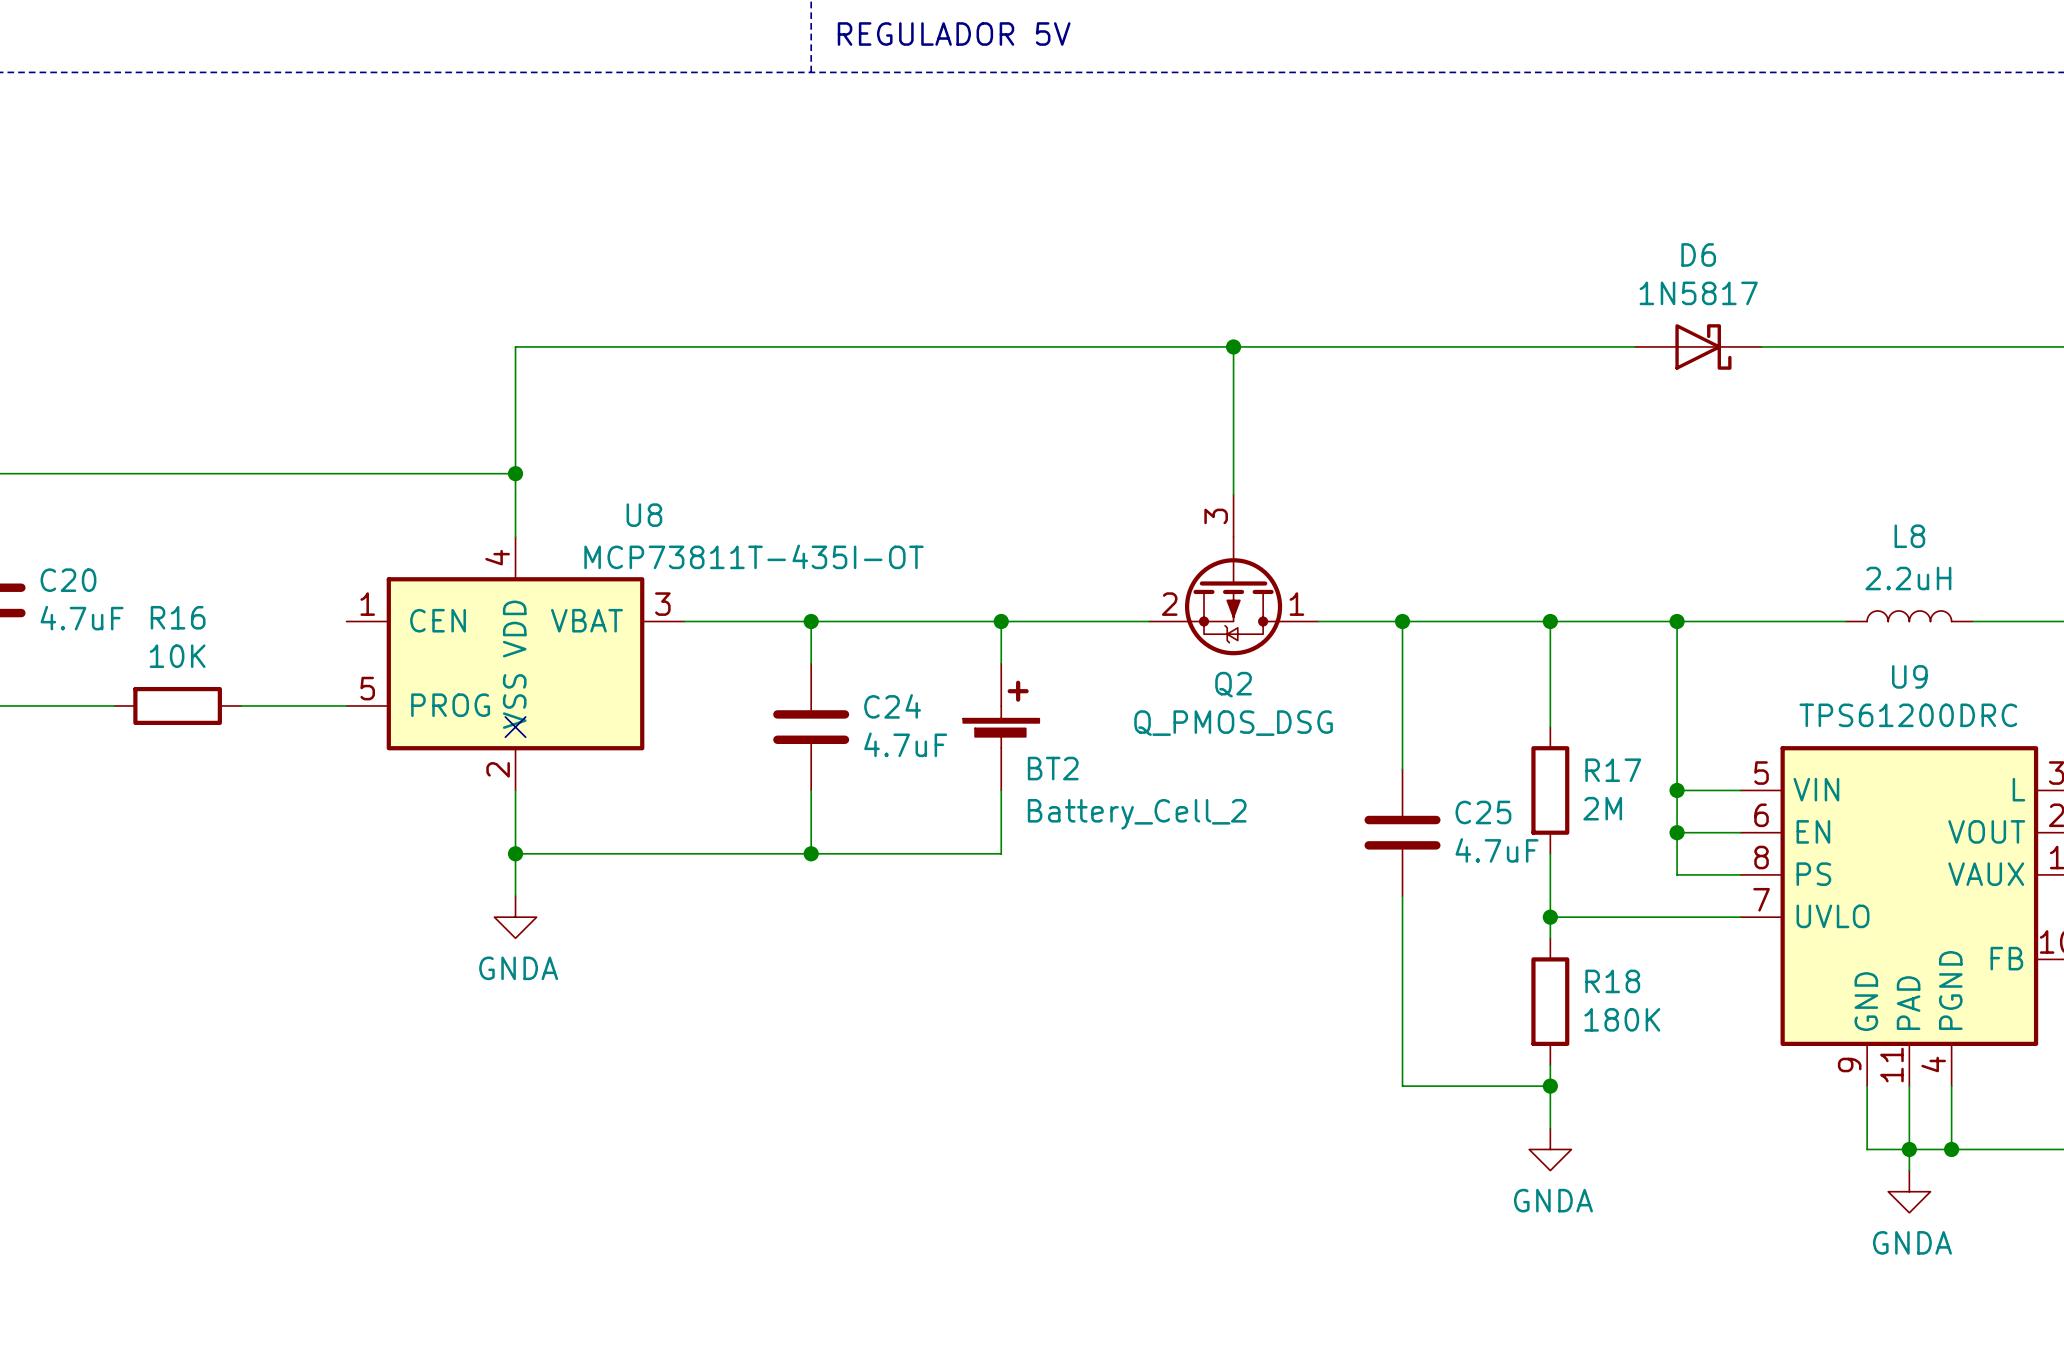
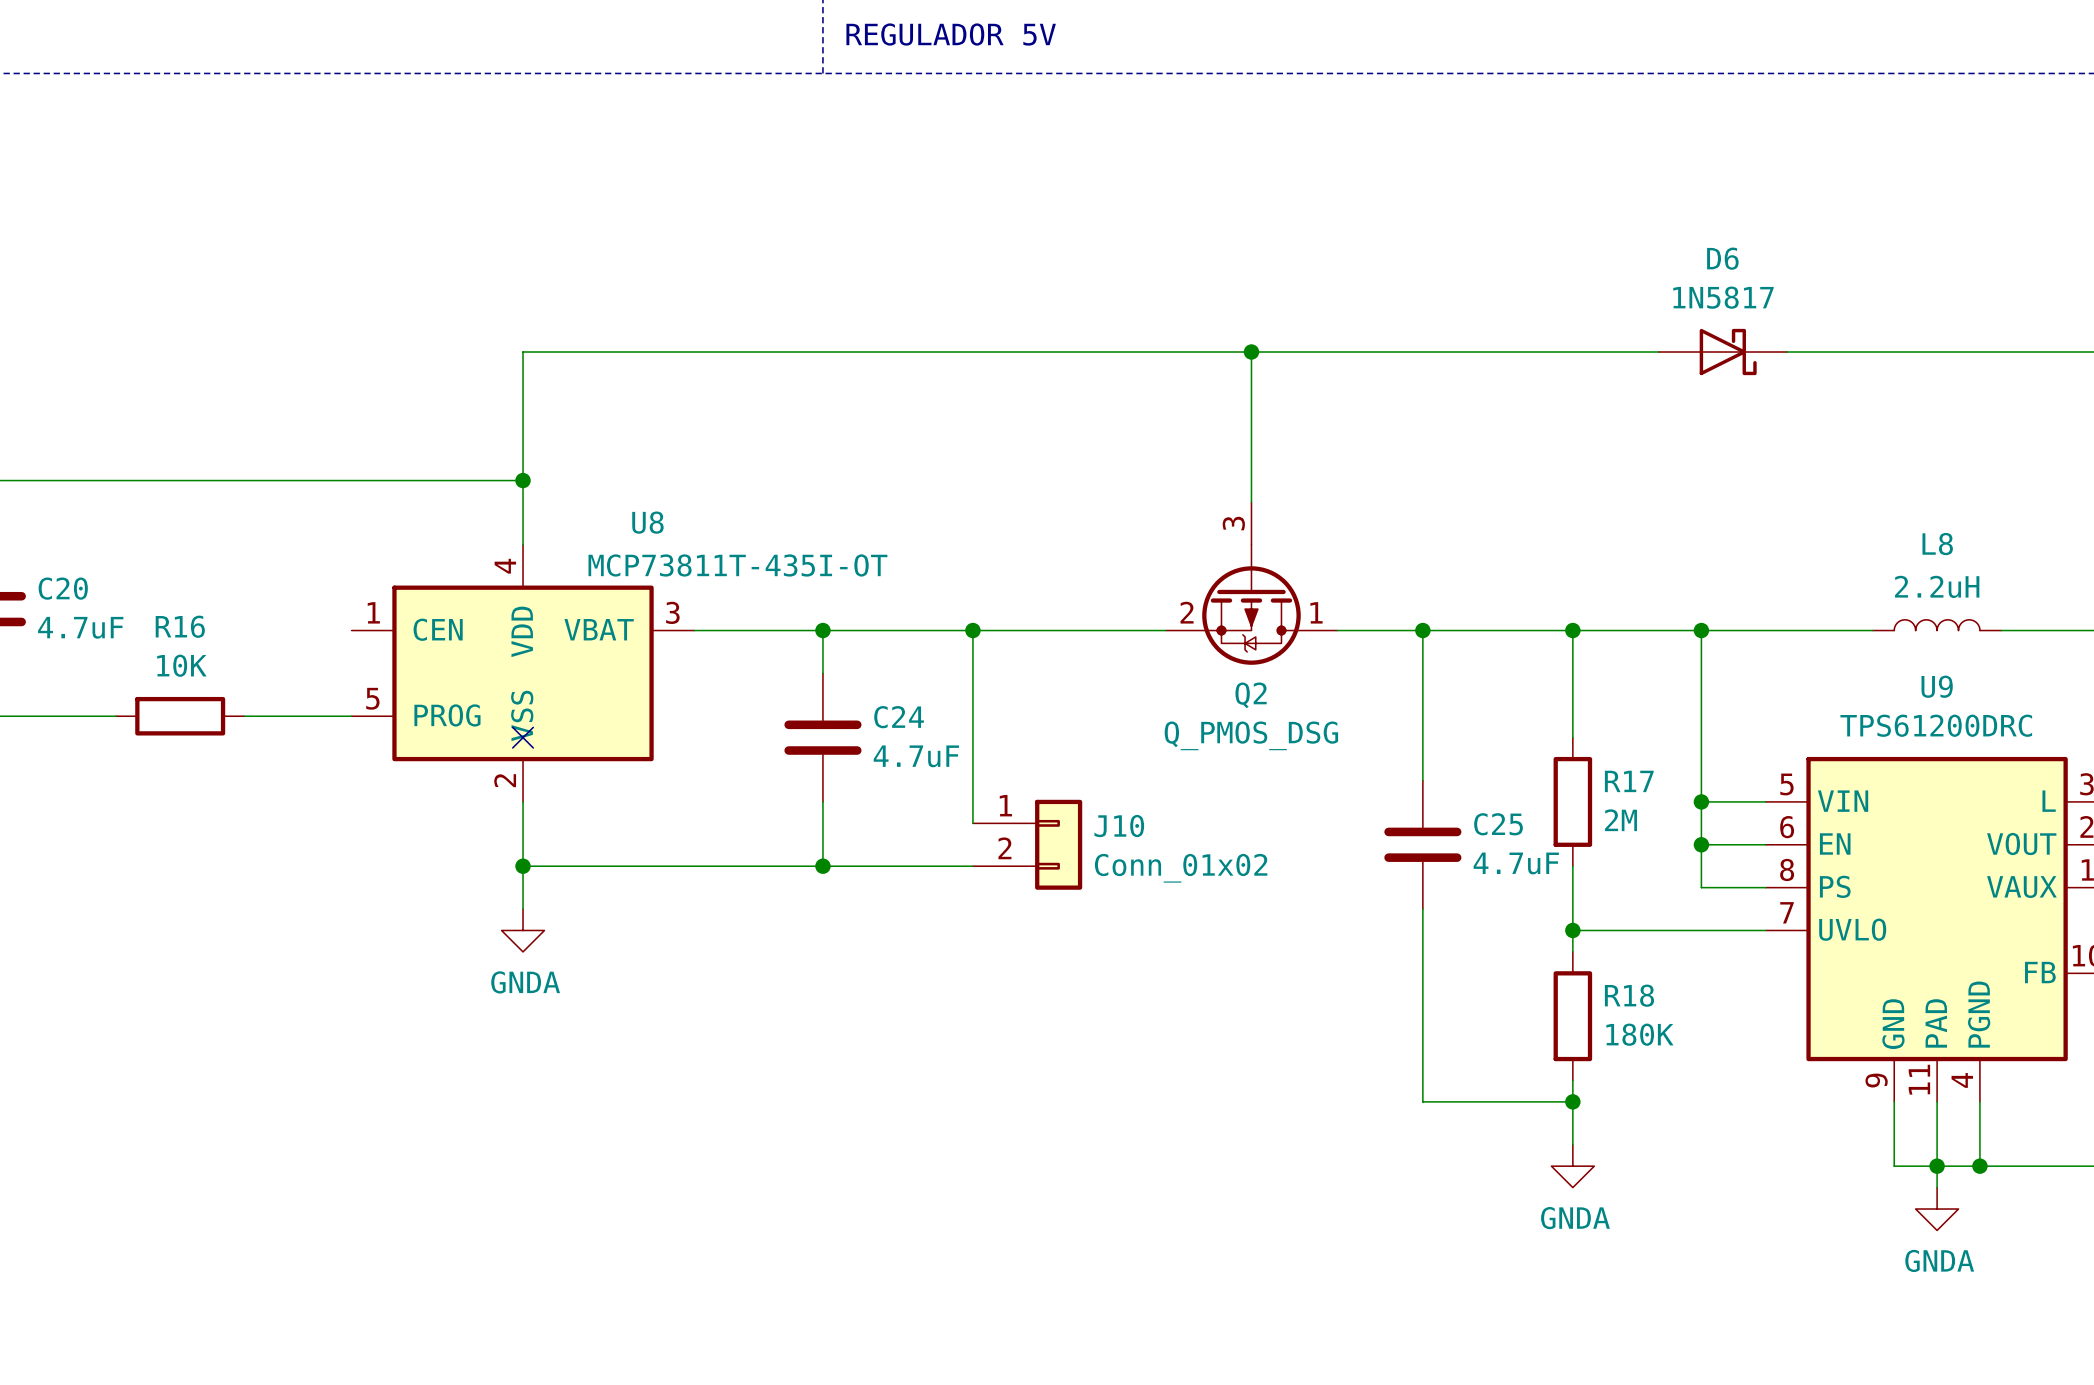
wire: none -> (972, 630) (972, 823)
wire: (1001, 621) (1001, 663) -> none
junction position: (1001, 621) -> (972, 630)
BT2: Battery_Cell_2 (1001, 727) -> none
wire: (1001, 790) (1001, 853) (959, 853) -> none
J10: none -> Conn_01x02 (1027, 844)

